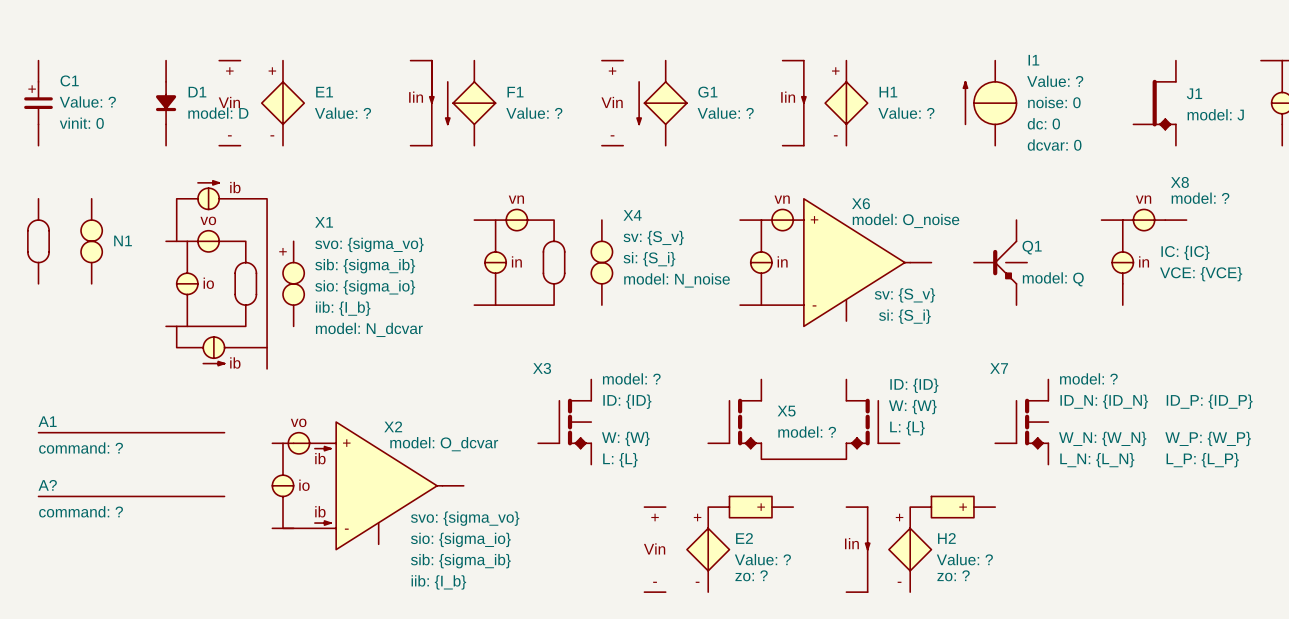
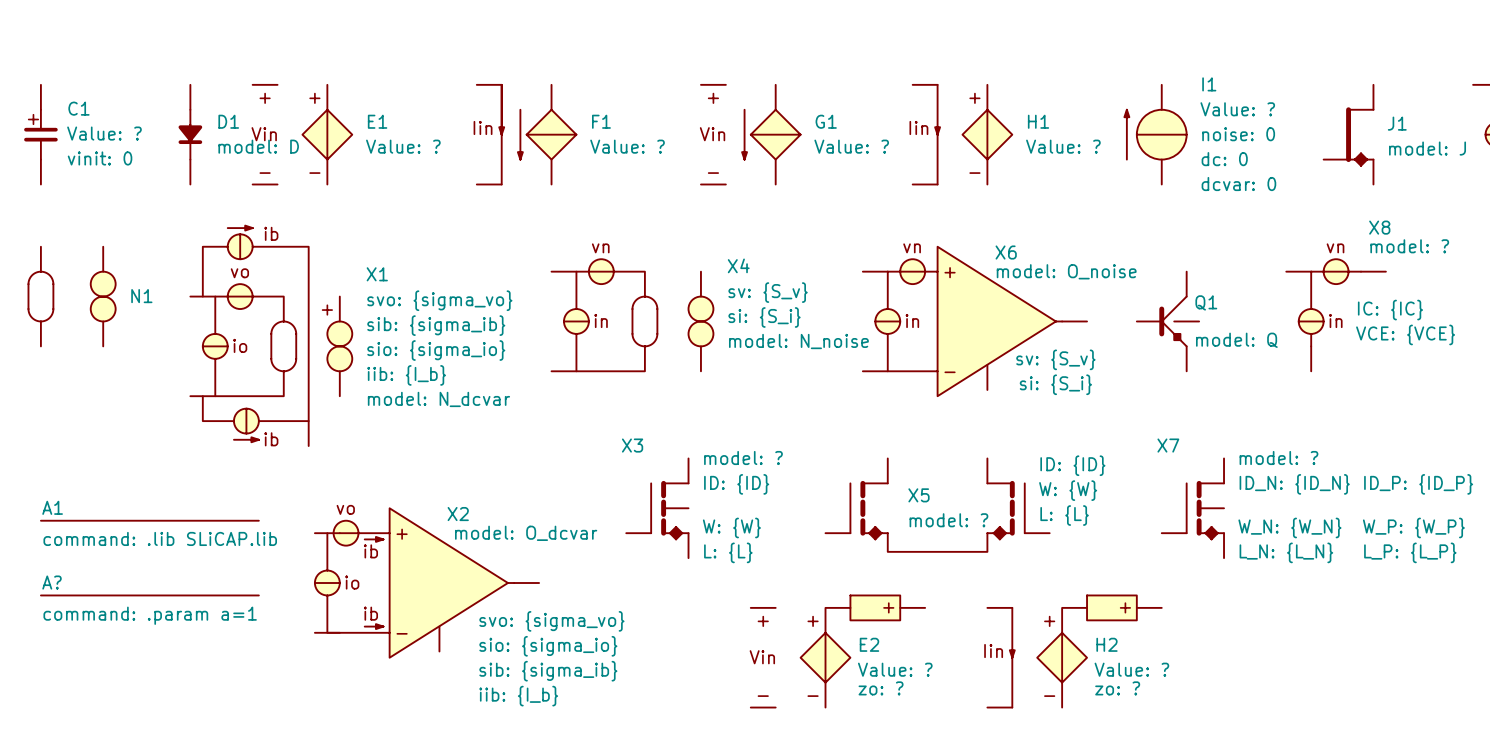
A1 text: command: ? (81, 448) -> command: .lib SLiCAP.lib (160, 538)
A? text: command: ? (81, 511) -> command: .param a=1 (150, 615)

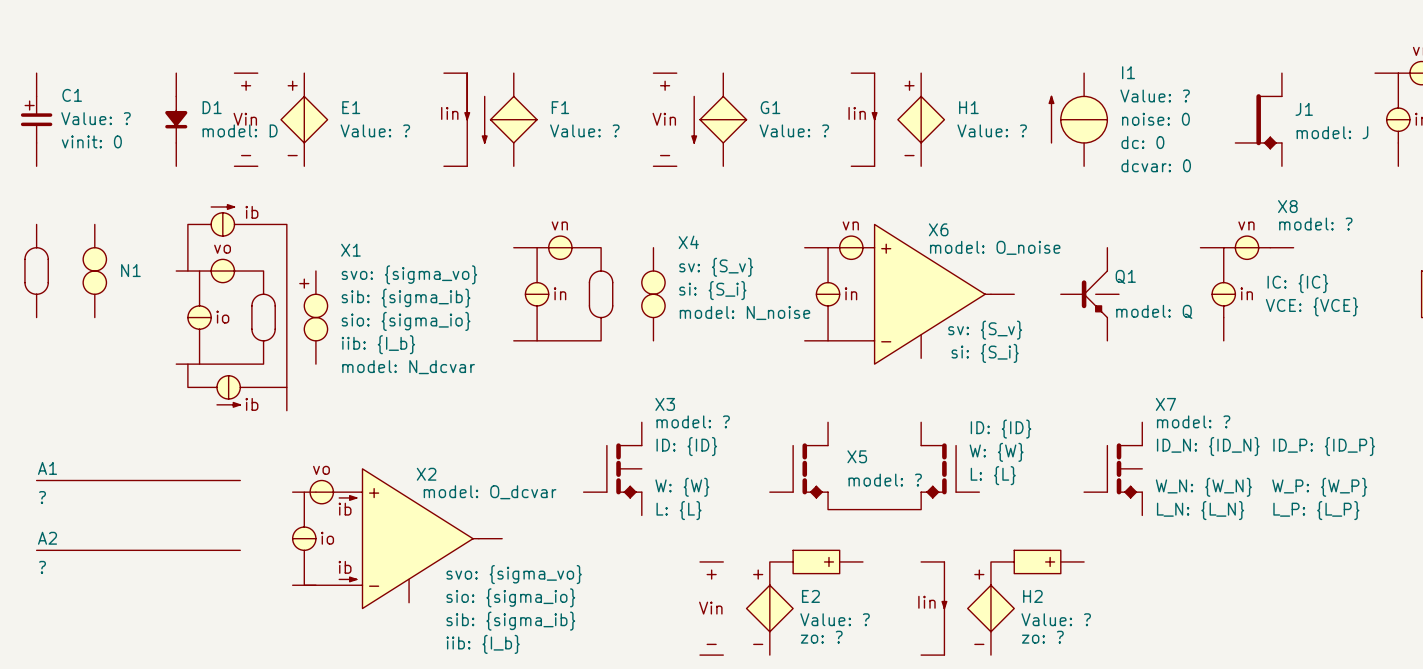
X3 name position: X3 (632, 445) -> X3 (665, 404)
X7 name position: X7 (1168, 445) -> X7 (1165, 404)
A1 text: command: .lib SLiCAP.lib (160, 538) -> ? (42, 497)
A? name: A? (51, 582) -> A2 (47, 538)
A? text: command: .param a=1 (150, 615) -> ? (42, 567)

